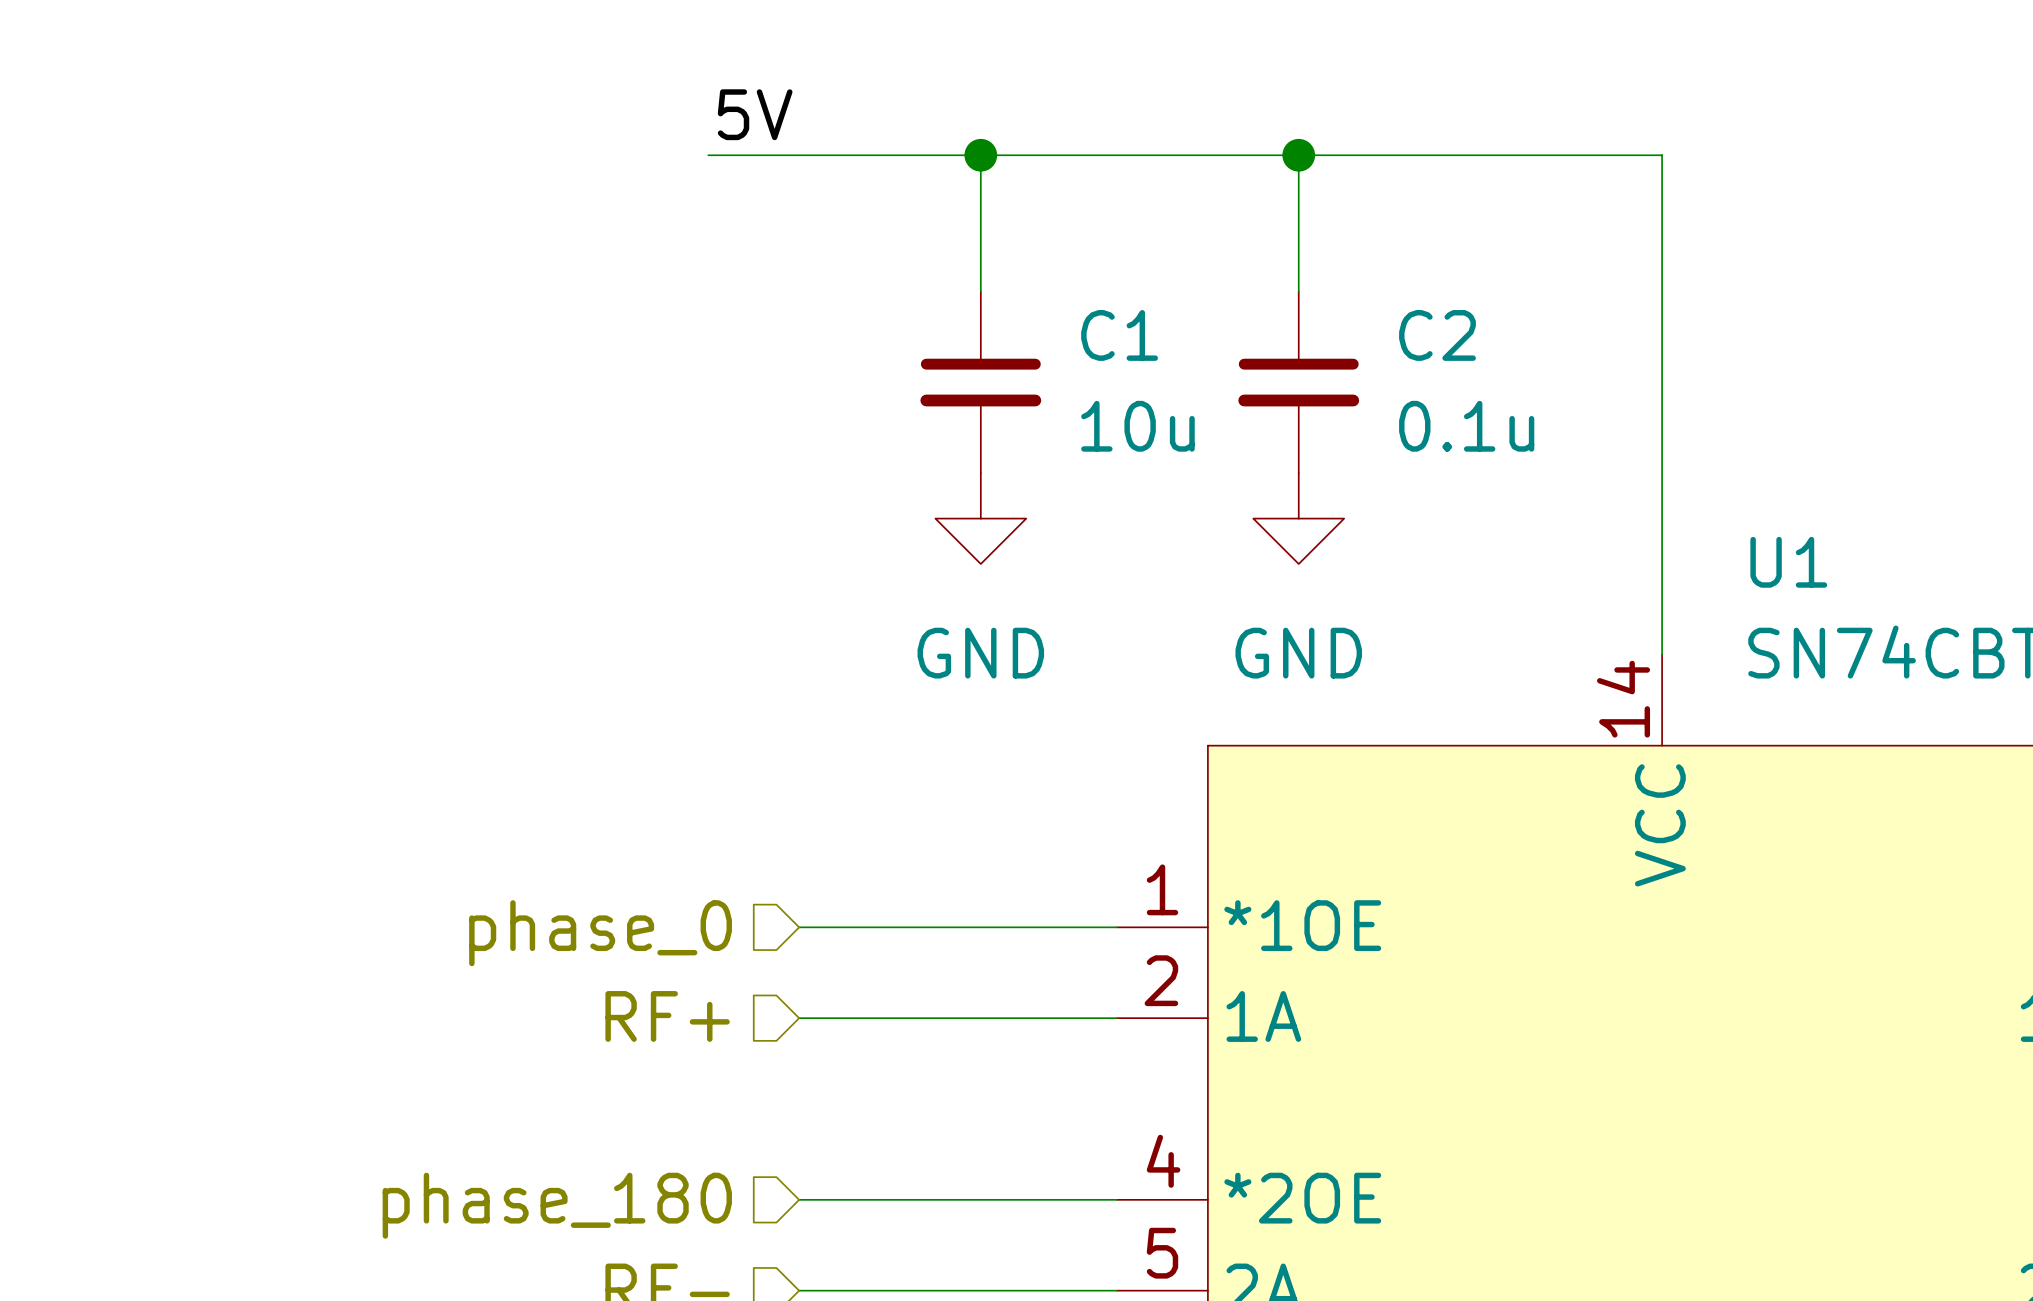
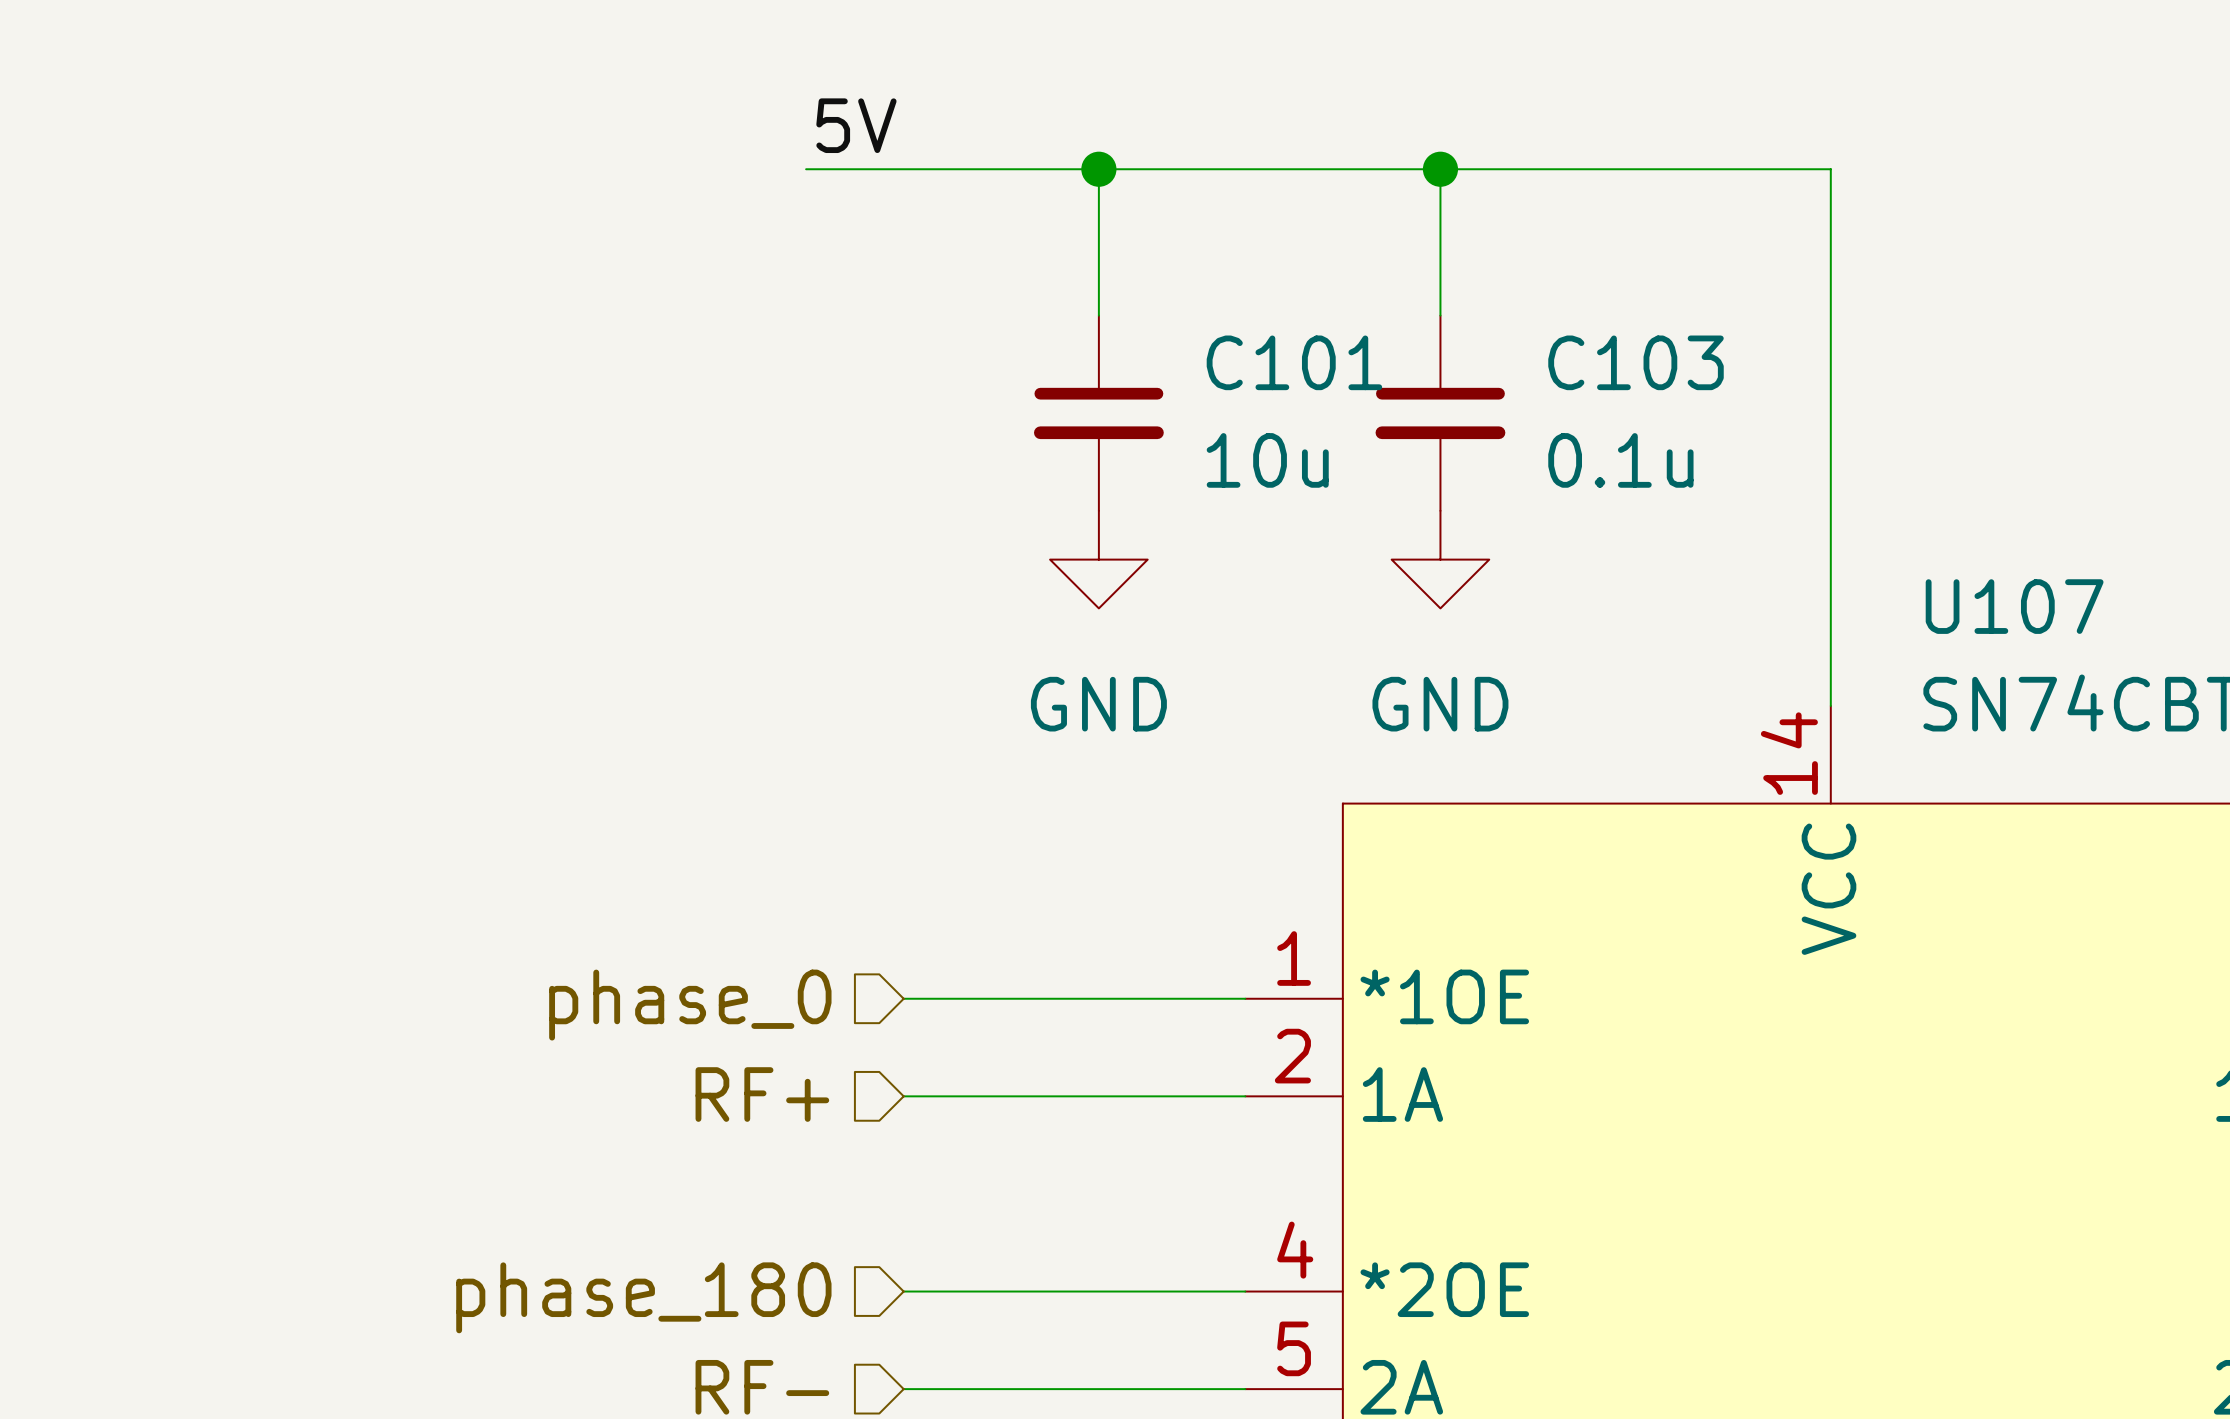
C1 name: C1 (1119, 335) -> C101 (1294, 362)
C2 name: C2 (1437, 335) -> C103 (1636, 362)
U1 name: U1 (1788, 562) -> U107 (2014, 606)

